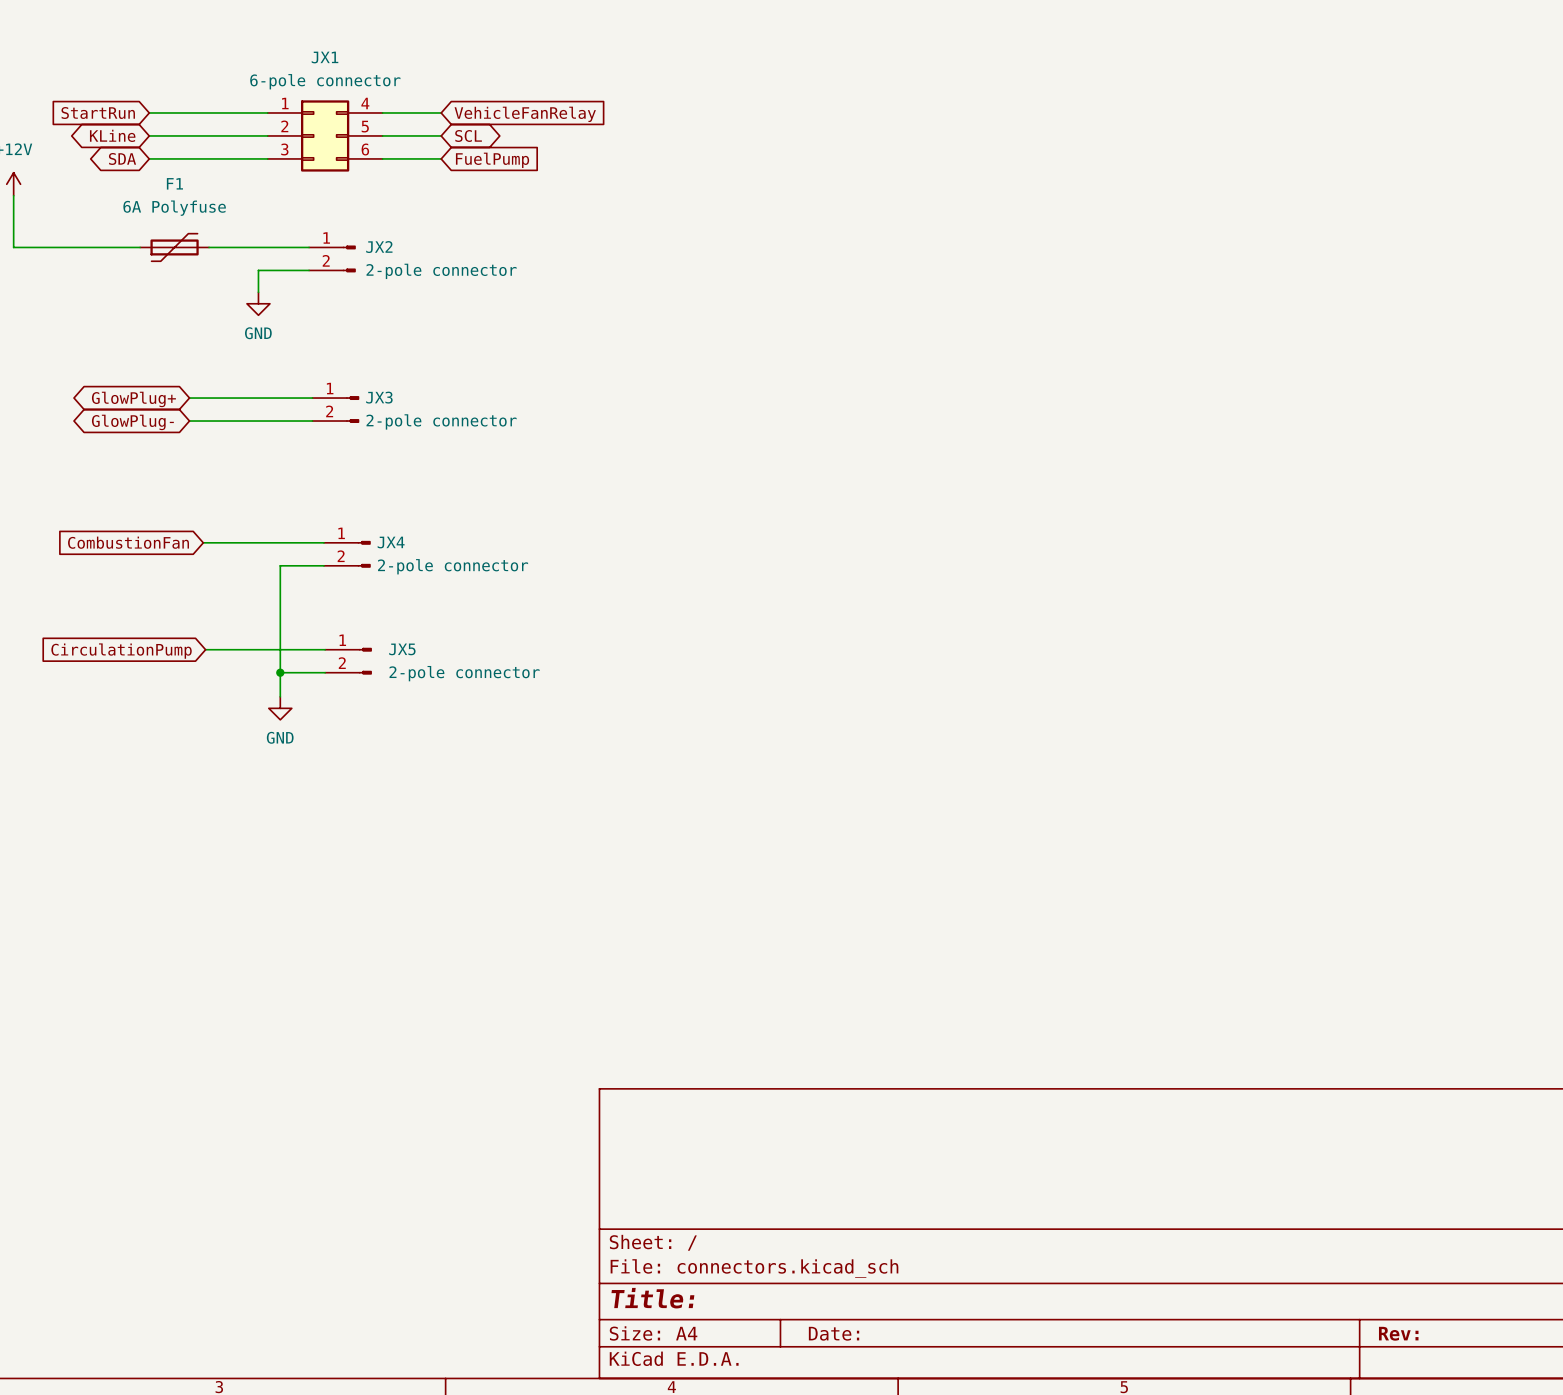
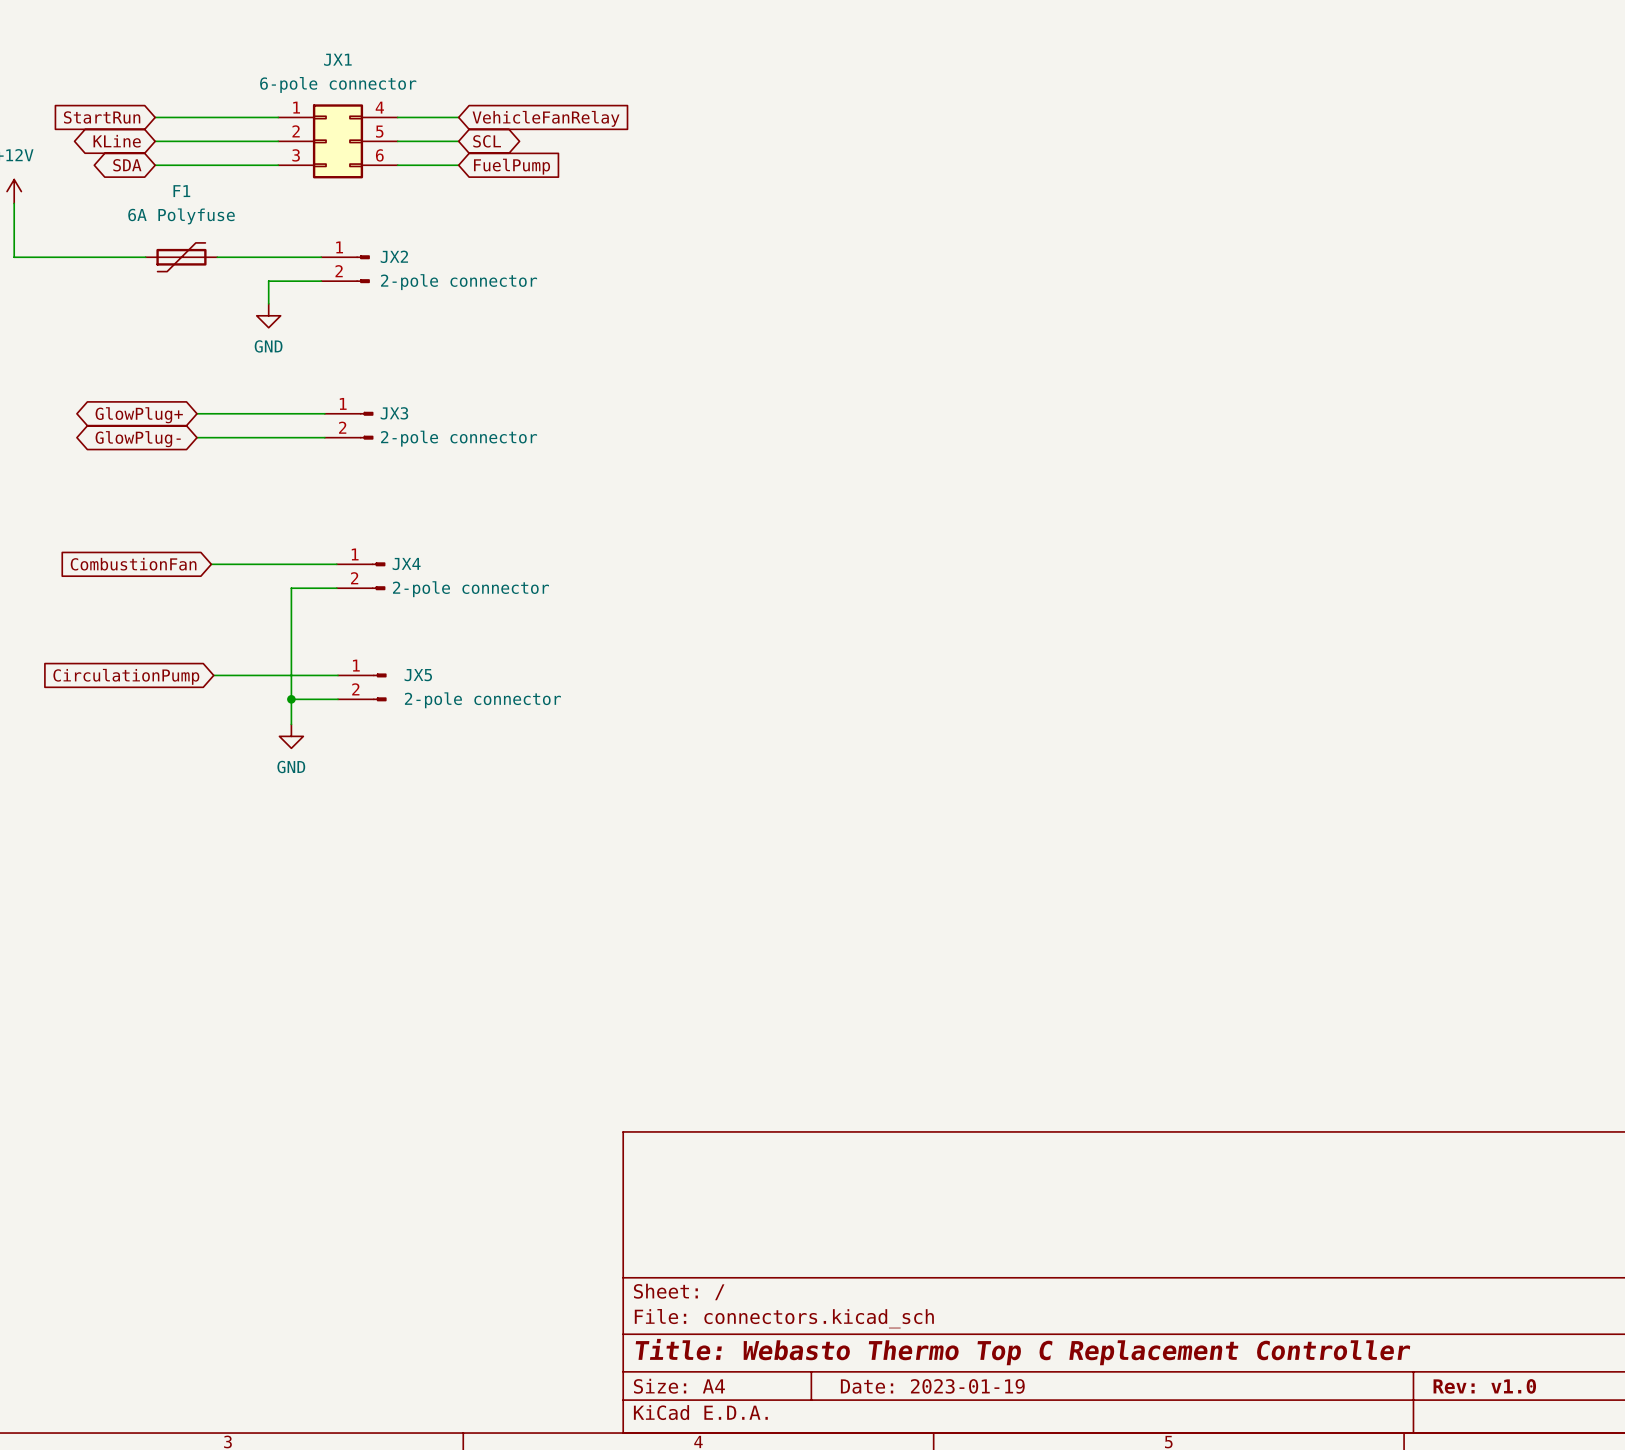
title block: Title: (652, 1298) -> Title: Webasto Thermo Top C Replacement Controller (1022, 1352)
title block: Date: (834, 1333) -> Date: 2023-01-19 (932, 1386)
title block: Rev: (1398, 1333) -> Rev: v1.0 (1484, 1386)

